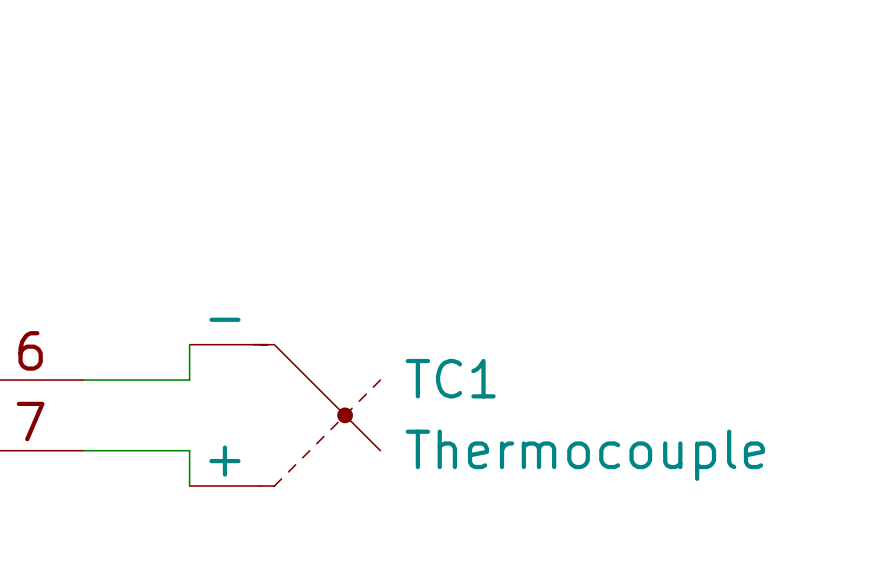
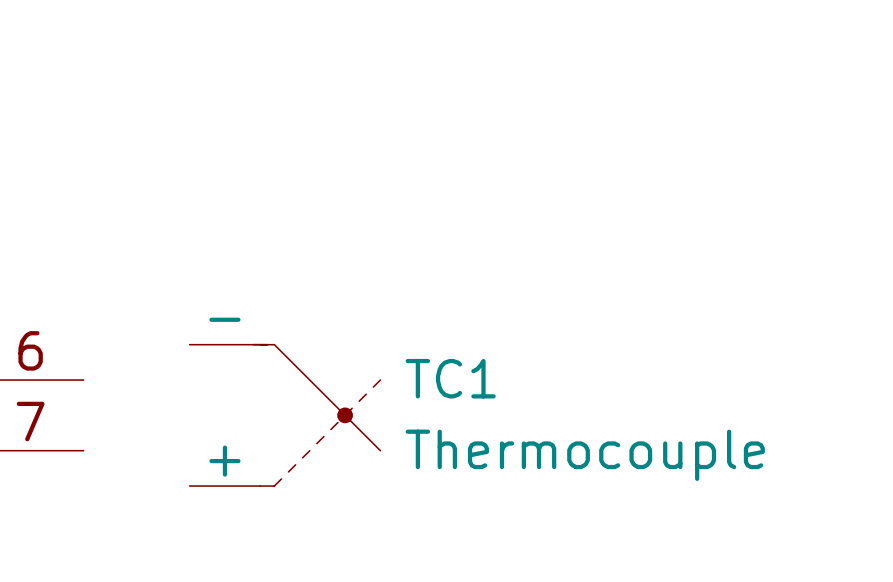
wire: (189, 344) (189, 380) (83, 380) -> none
wire: (83, 450) (189, 450) (189, 486) -> none

